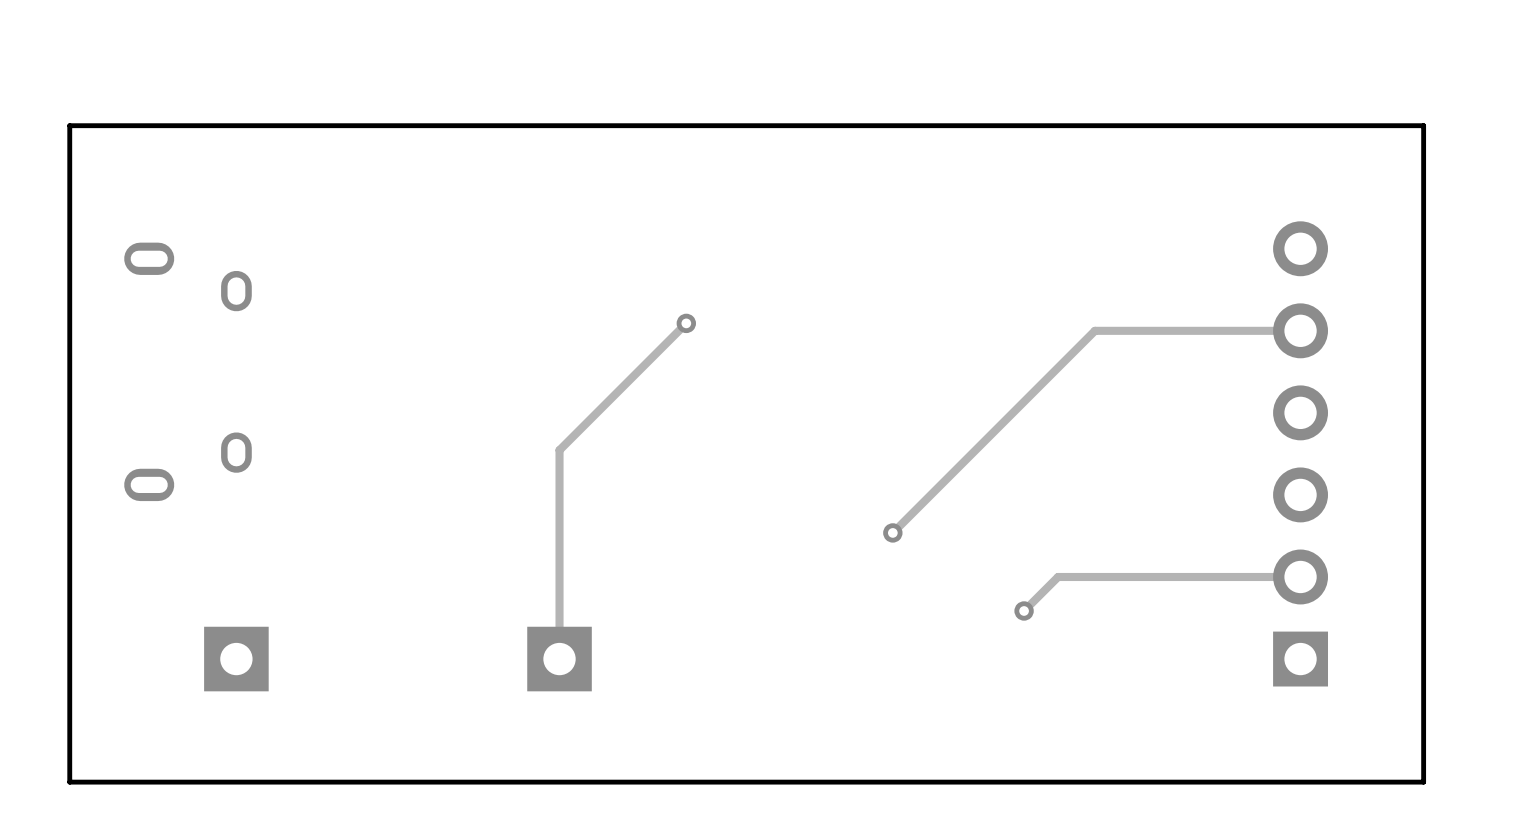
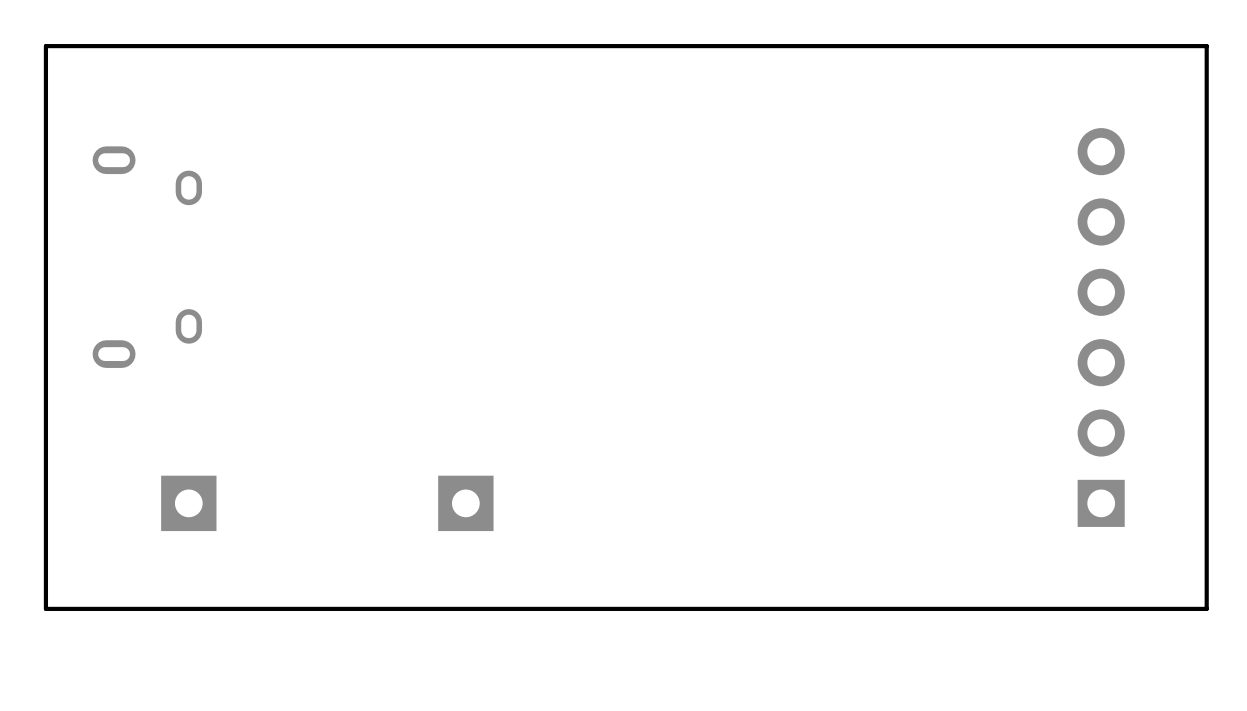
track: (686, 323) (559, 450) (559, 659) -> none
via: (686, 323) -> none
track: (1300, 330) (1094, 330) (892, 532) -> none
via: (892, 532) -> none
track: (1300, 576) (1058, 576) (1024, 610) -> none
via: (1024, 610) -> none

